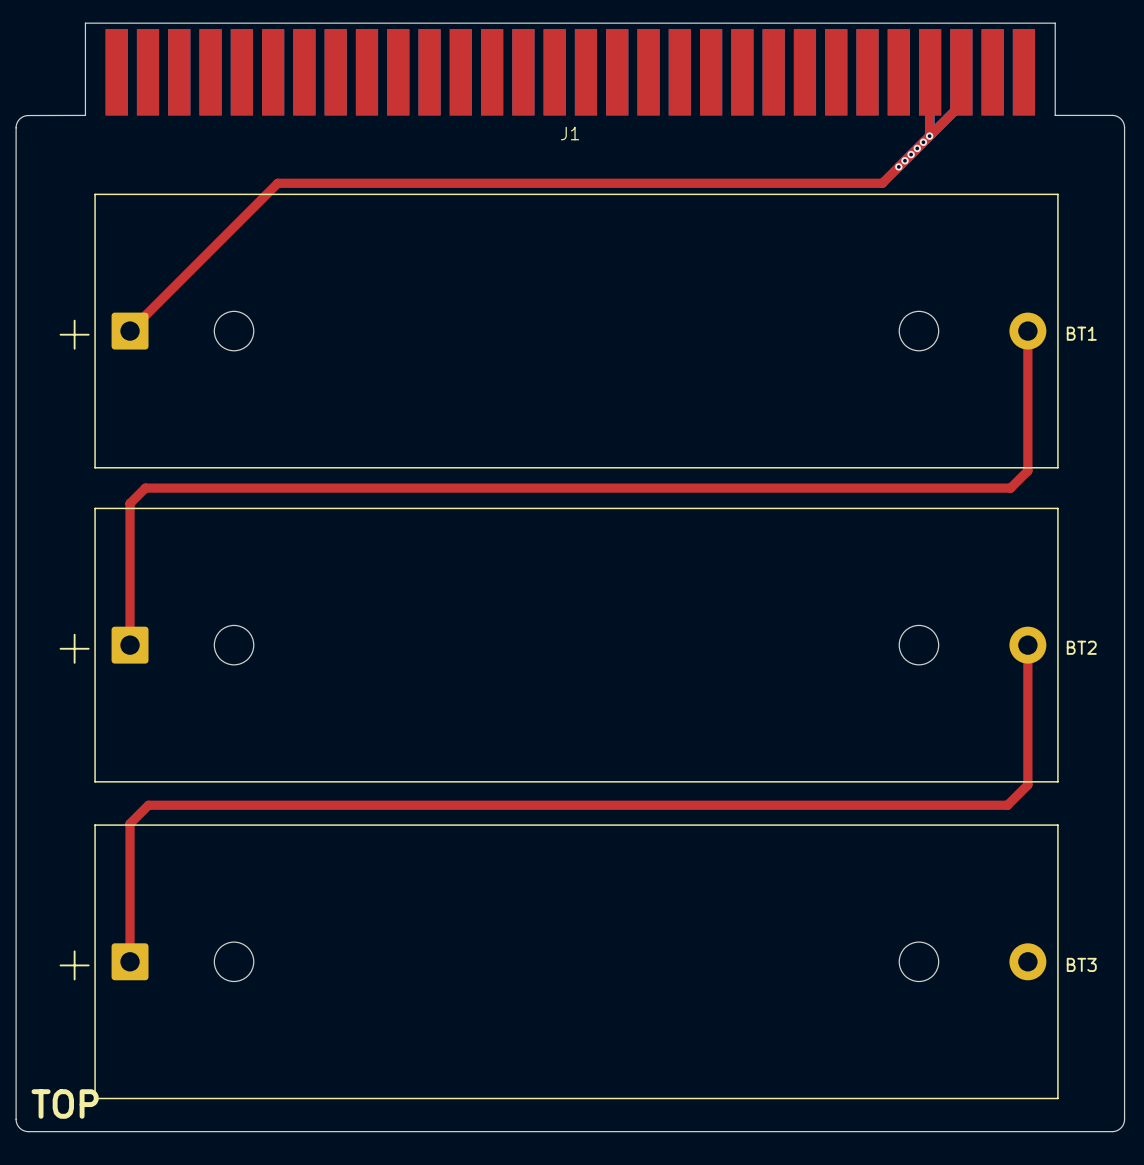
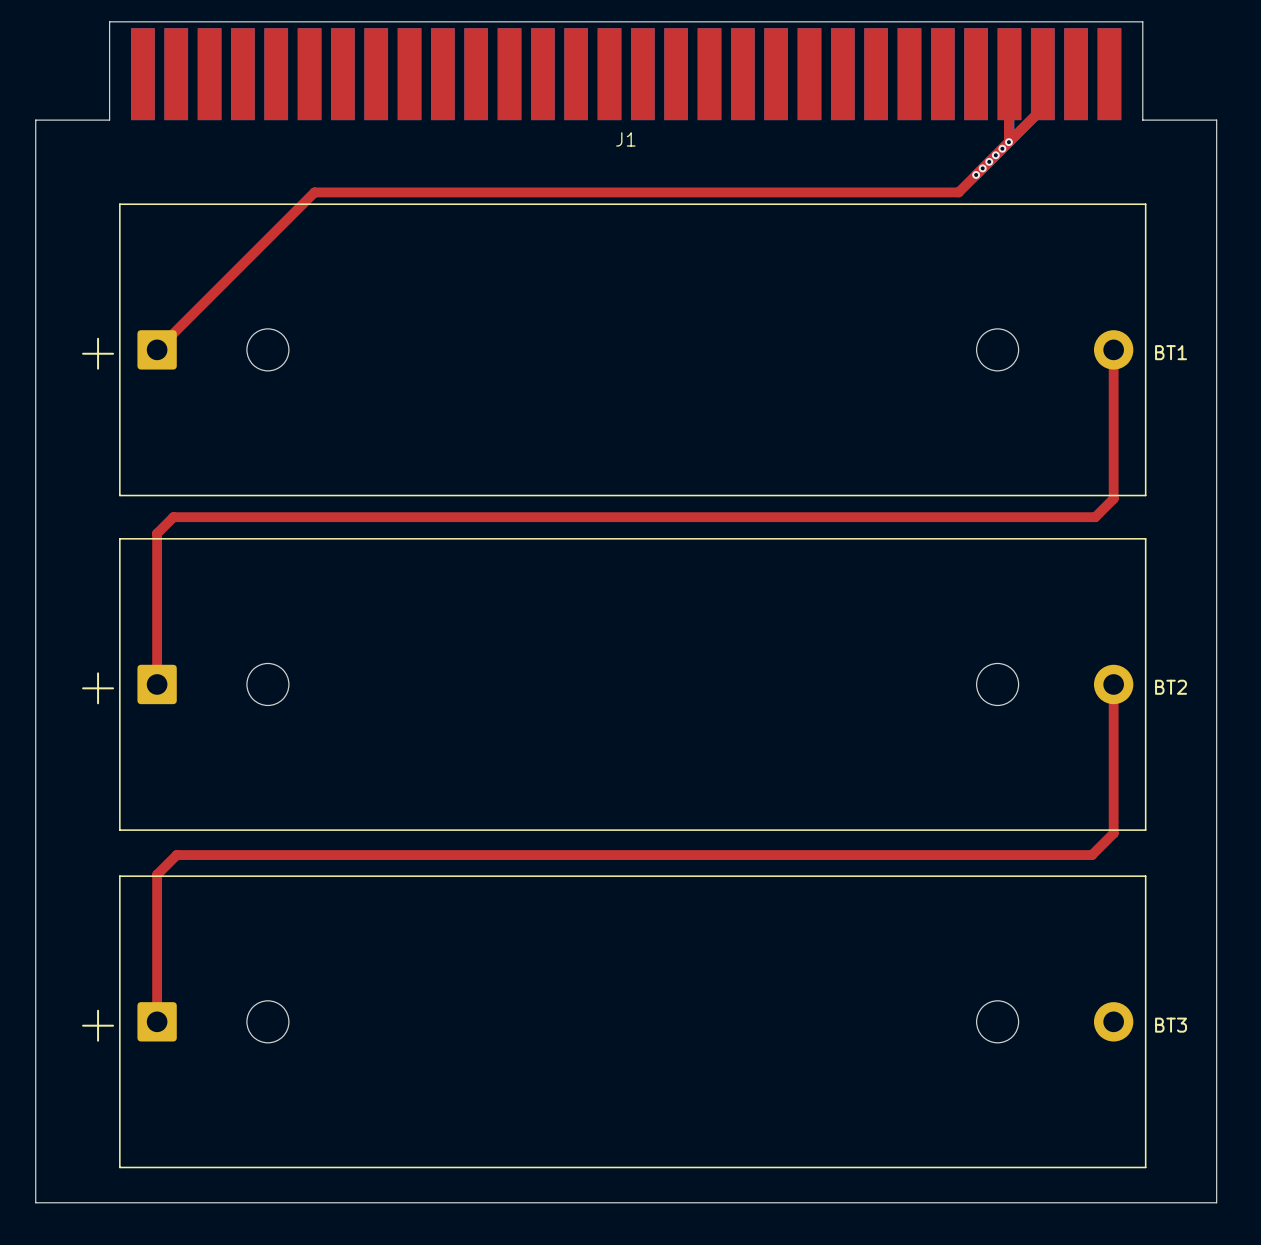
J1 footprint: [15, 22, 1125, 1132] -> [35, 21, 1217, 1204]

